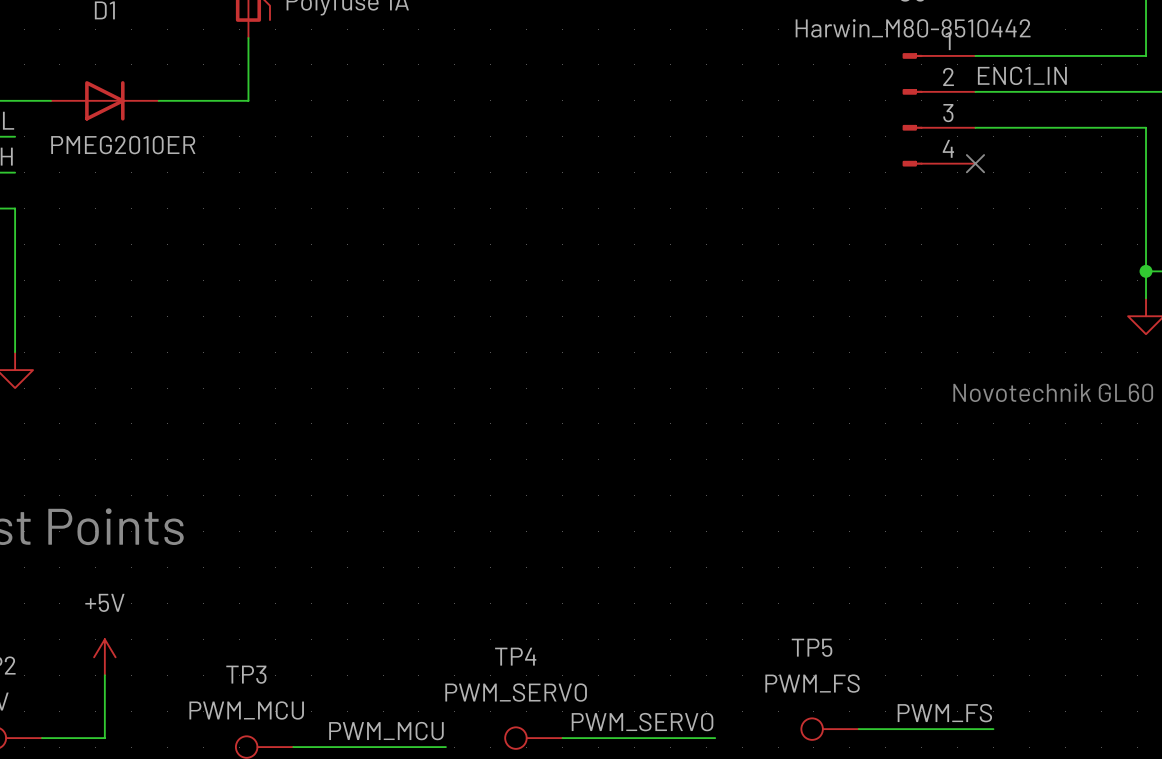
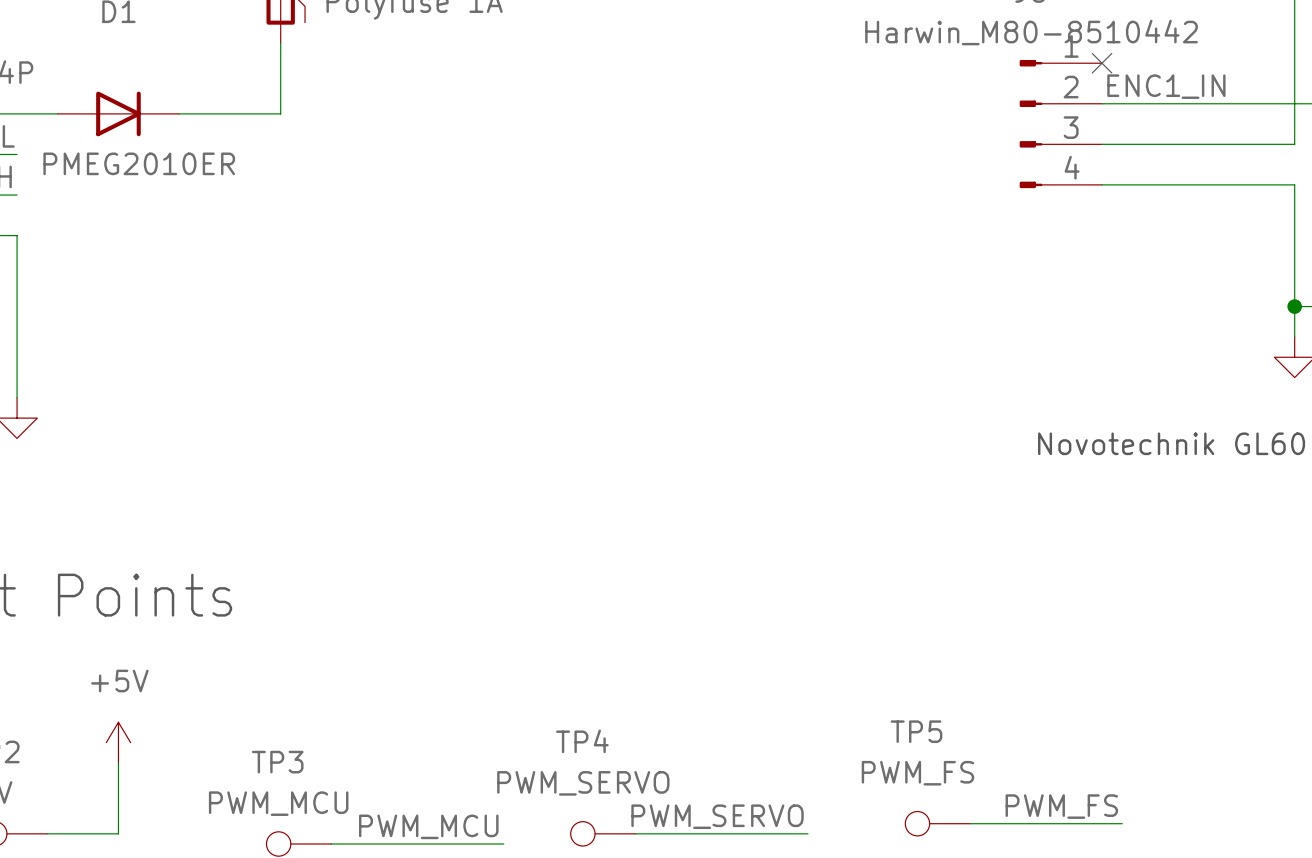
wire: (975, 55) (1146, 55) -> (1102, 184) (1294, 184)
no-connect mark: none -> (1102, 63)
wire: (1146, 127) (1146, 163) -> (1294, 144) (1294, 63)
no-connect mark: (975, 163) -> none

